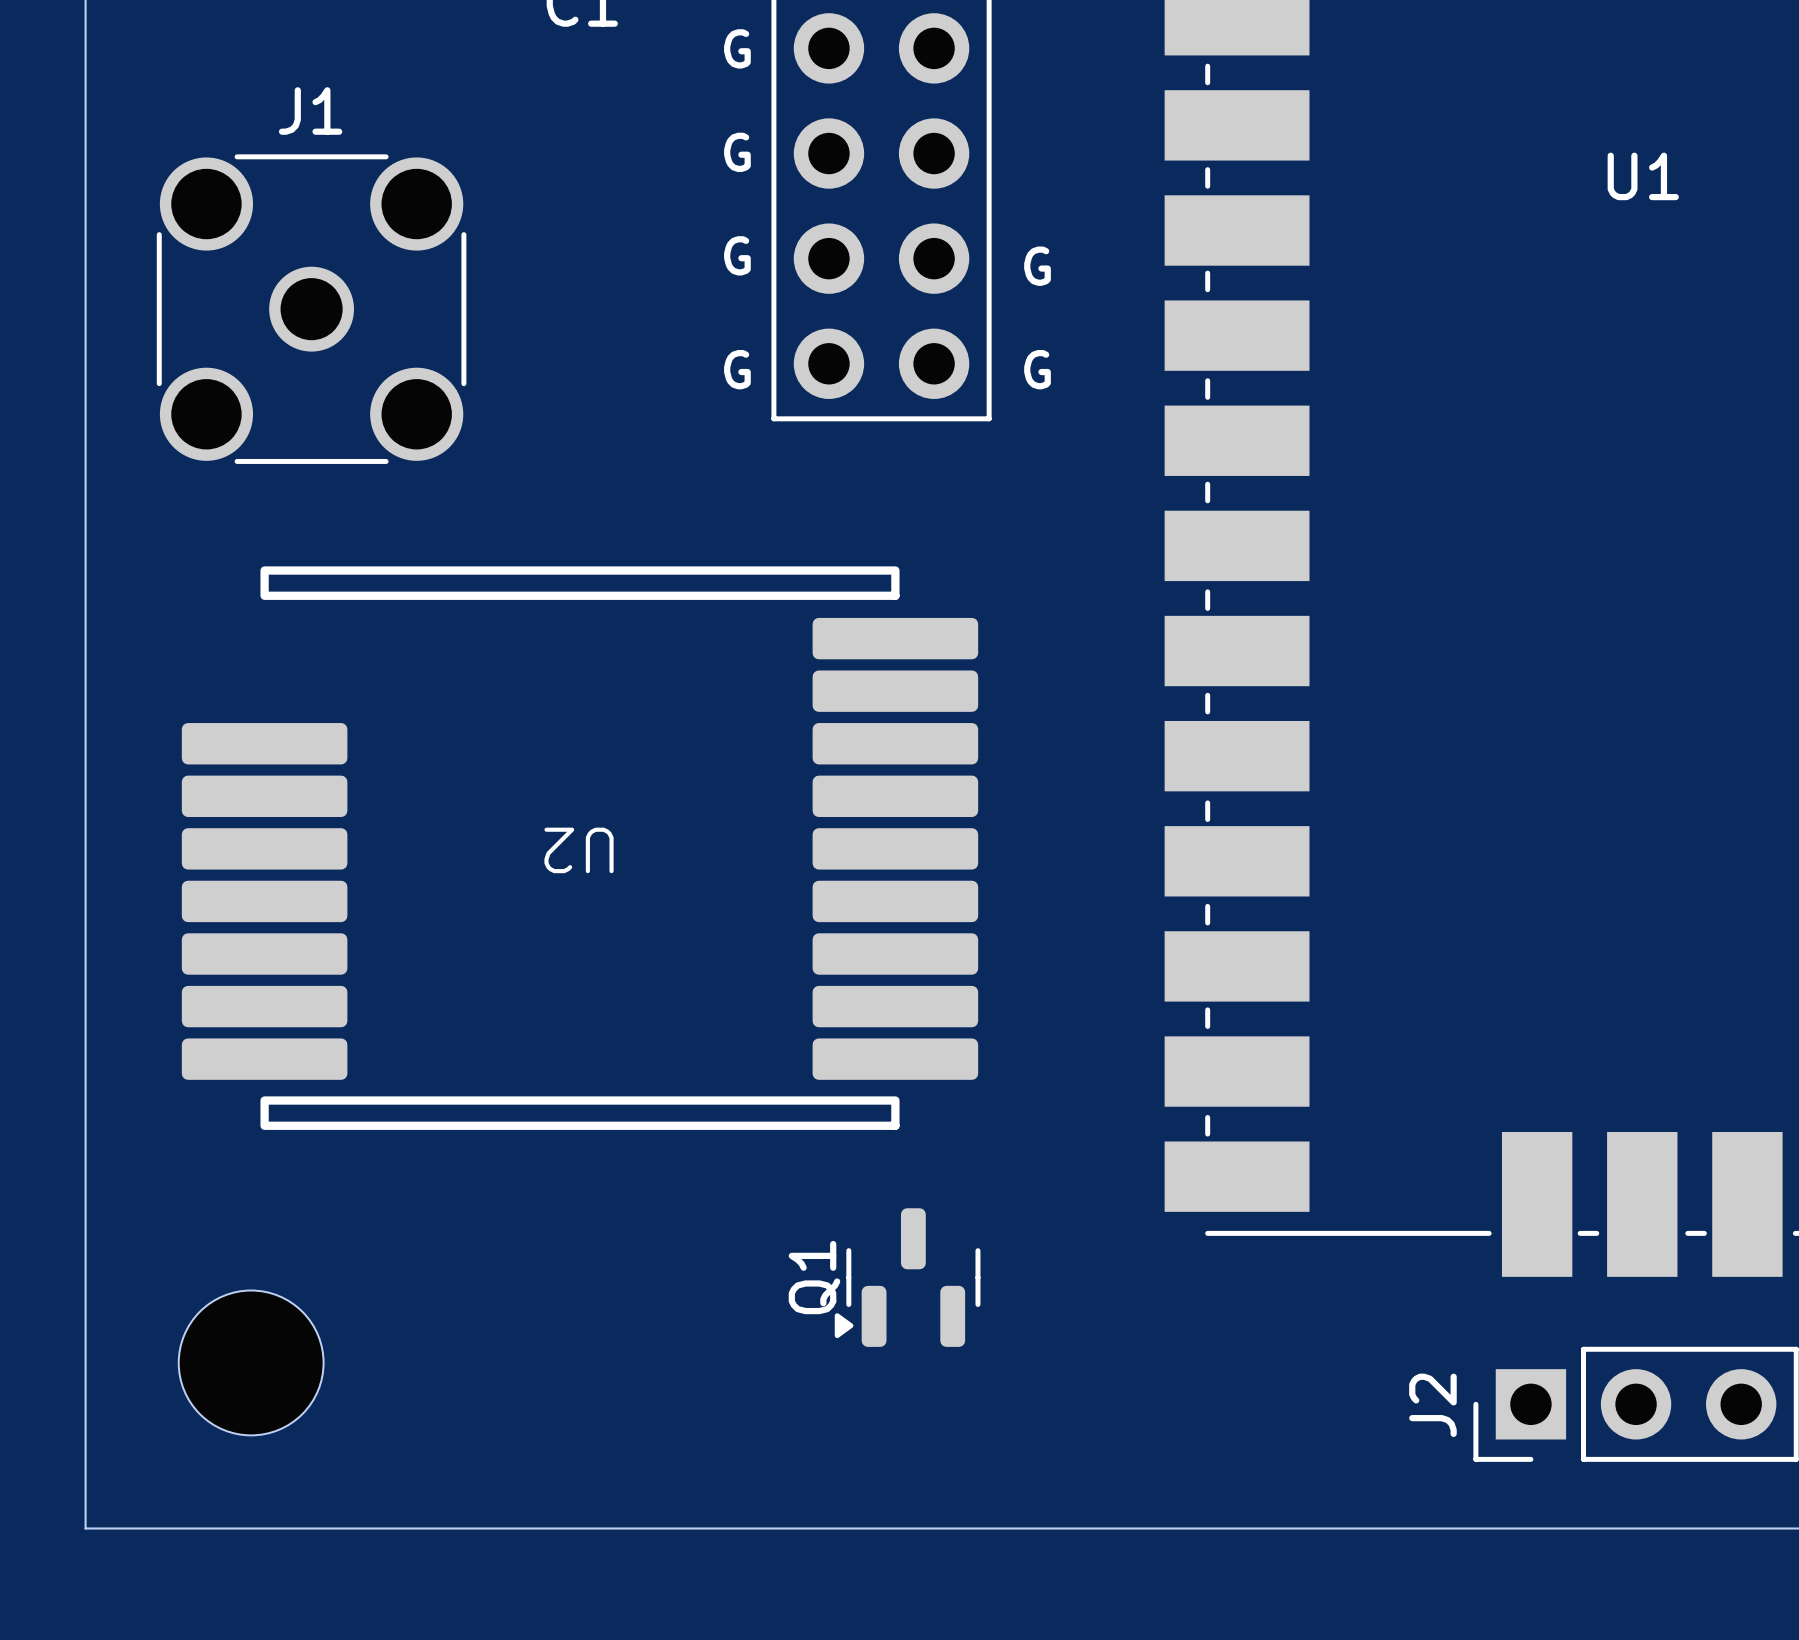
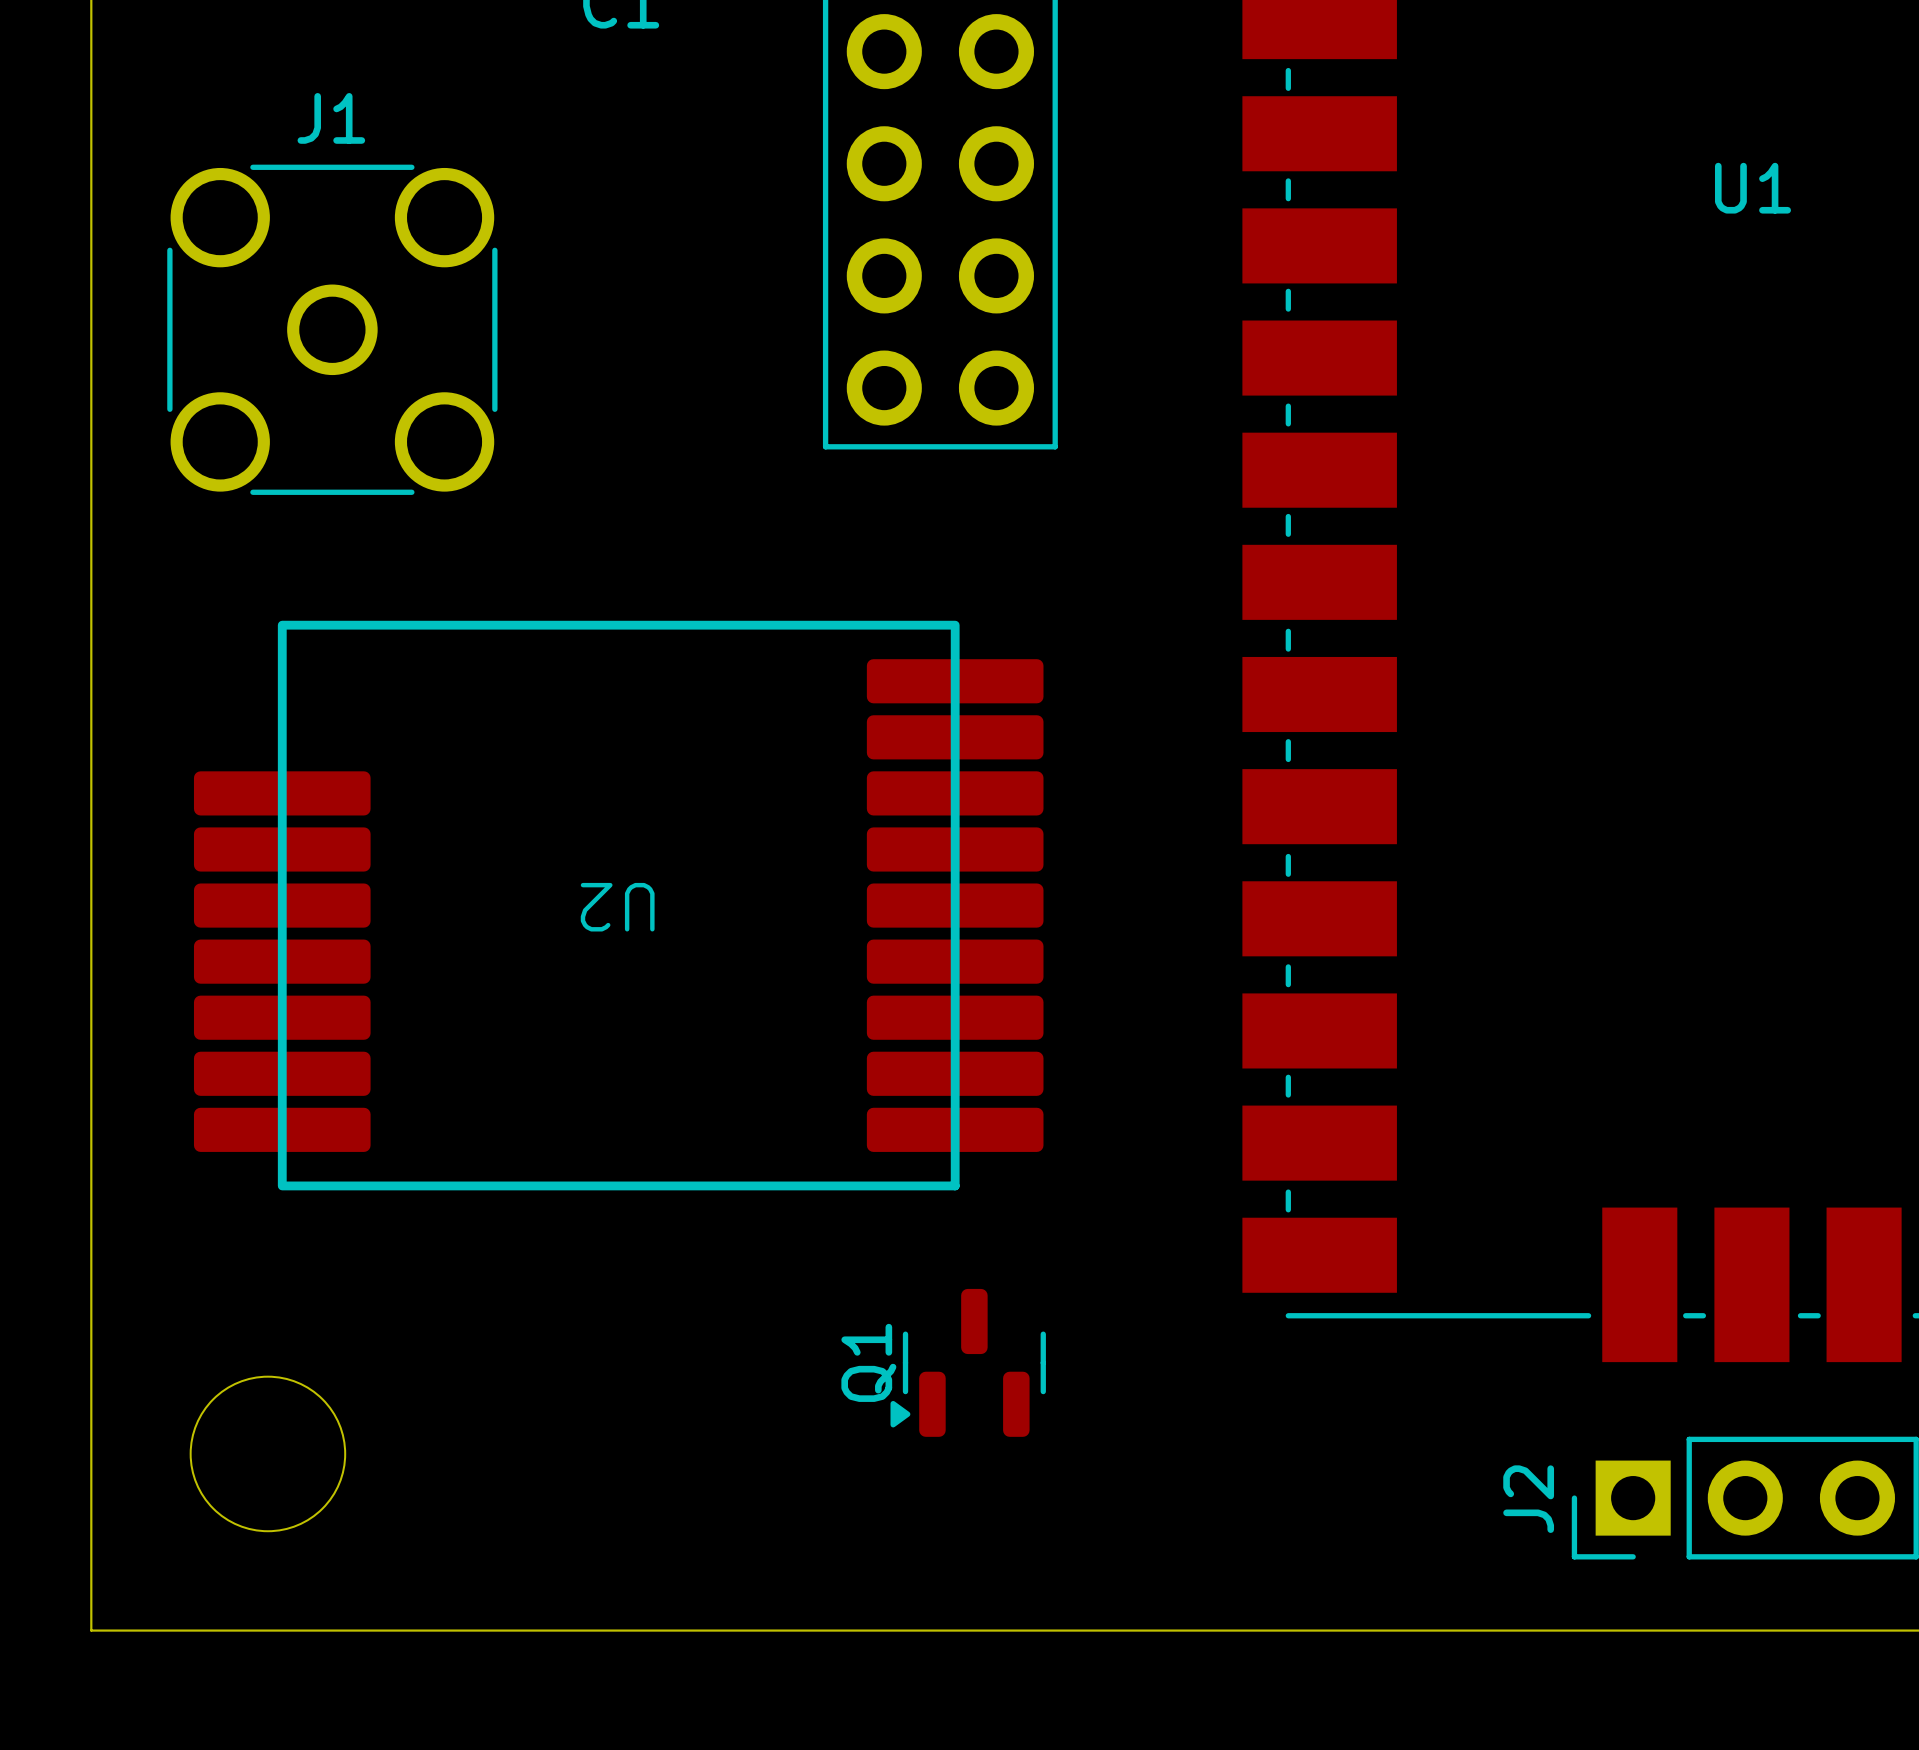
text: G (737, 48) -> none
text: G (737, 152) -> none
text: G (737, 255) -> none
text: G (1037, 266) -> none
text: G (737, 369) -> none
text: G (1037, 369) -> none
U2 footprint: [181, 566, 979, 1130] -> [193, 620, 1044, 1191]

